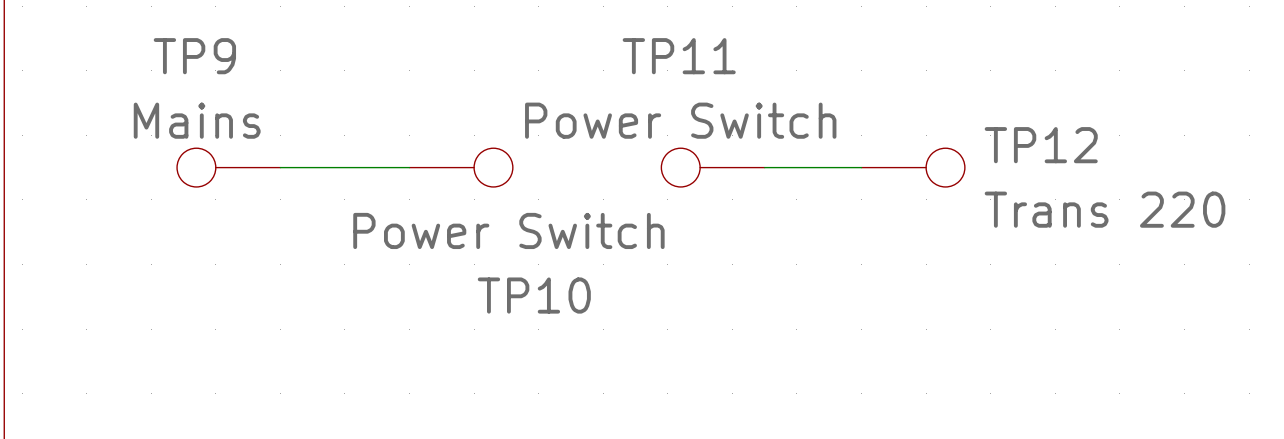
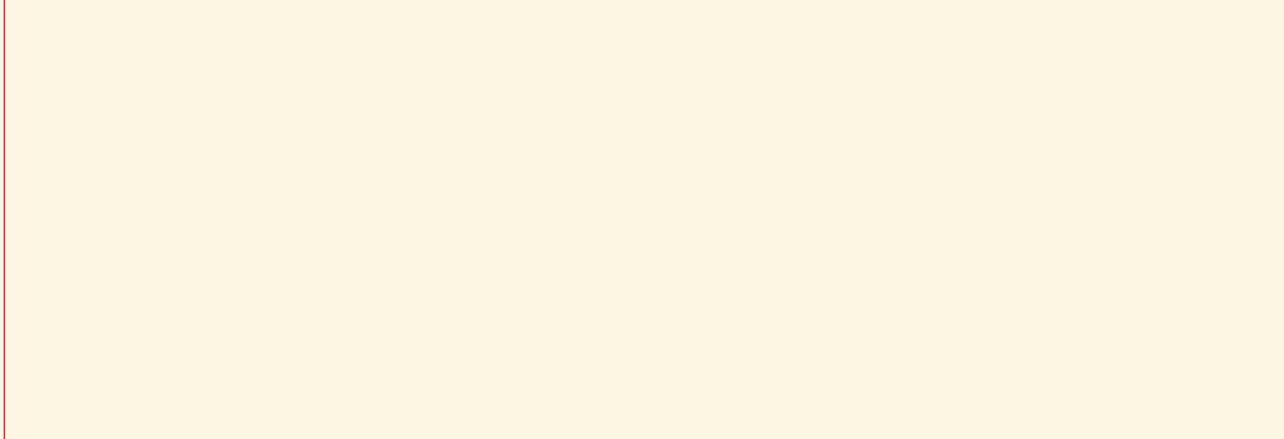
TP9: Mains (228, 167) -> none
wire: (280, 167) (409, 167) -> none
TP10: Power Switch (461, 167) -> none
TP11: Power Switch (713, 167) -> none
wire: (764, 167) (861, 167) -> none
TP12: Trans 220 (913, 167) -> none

